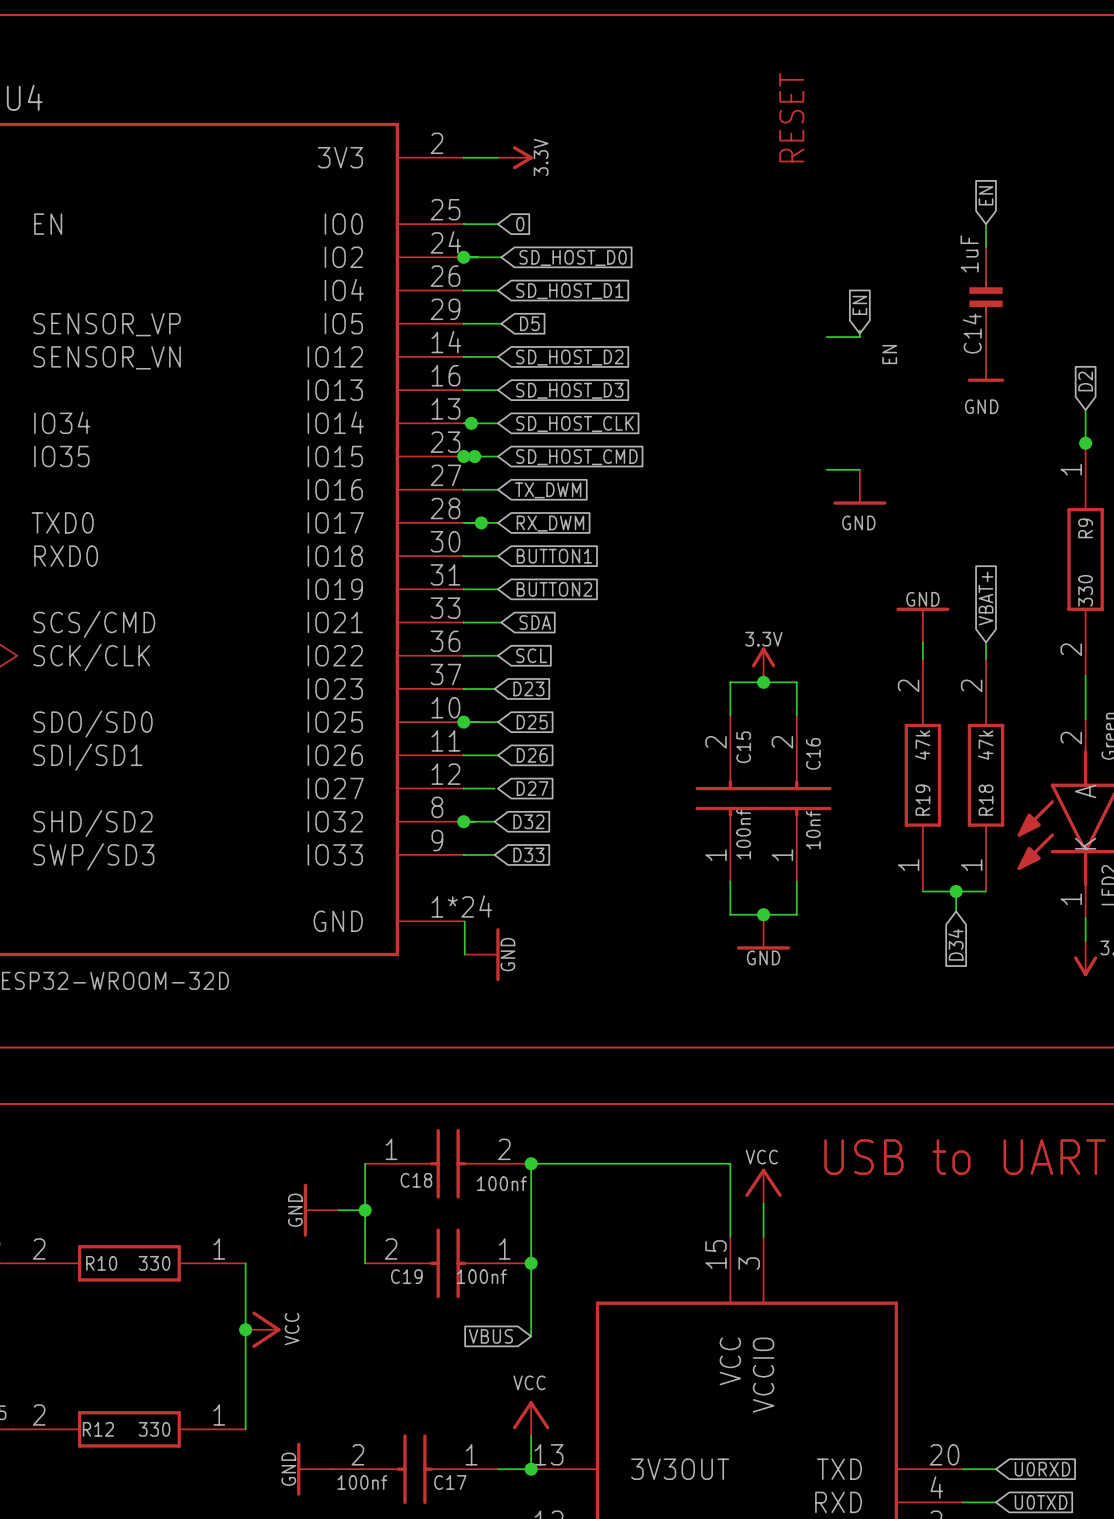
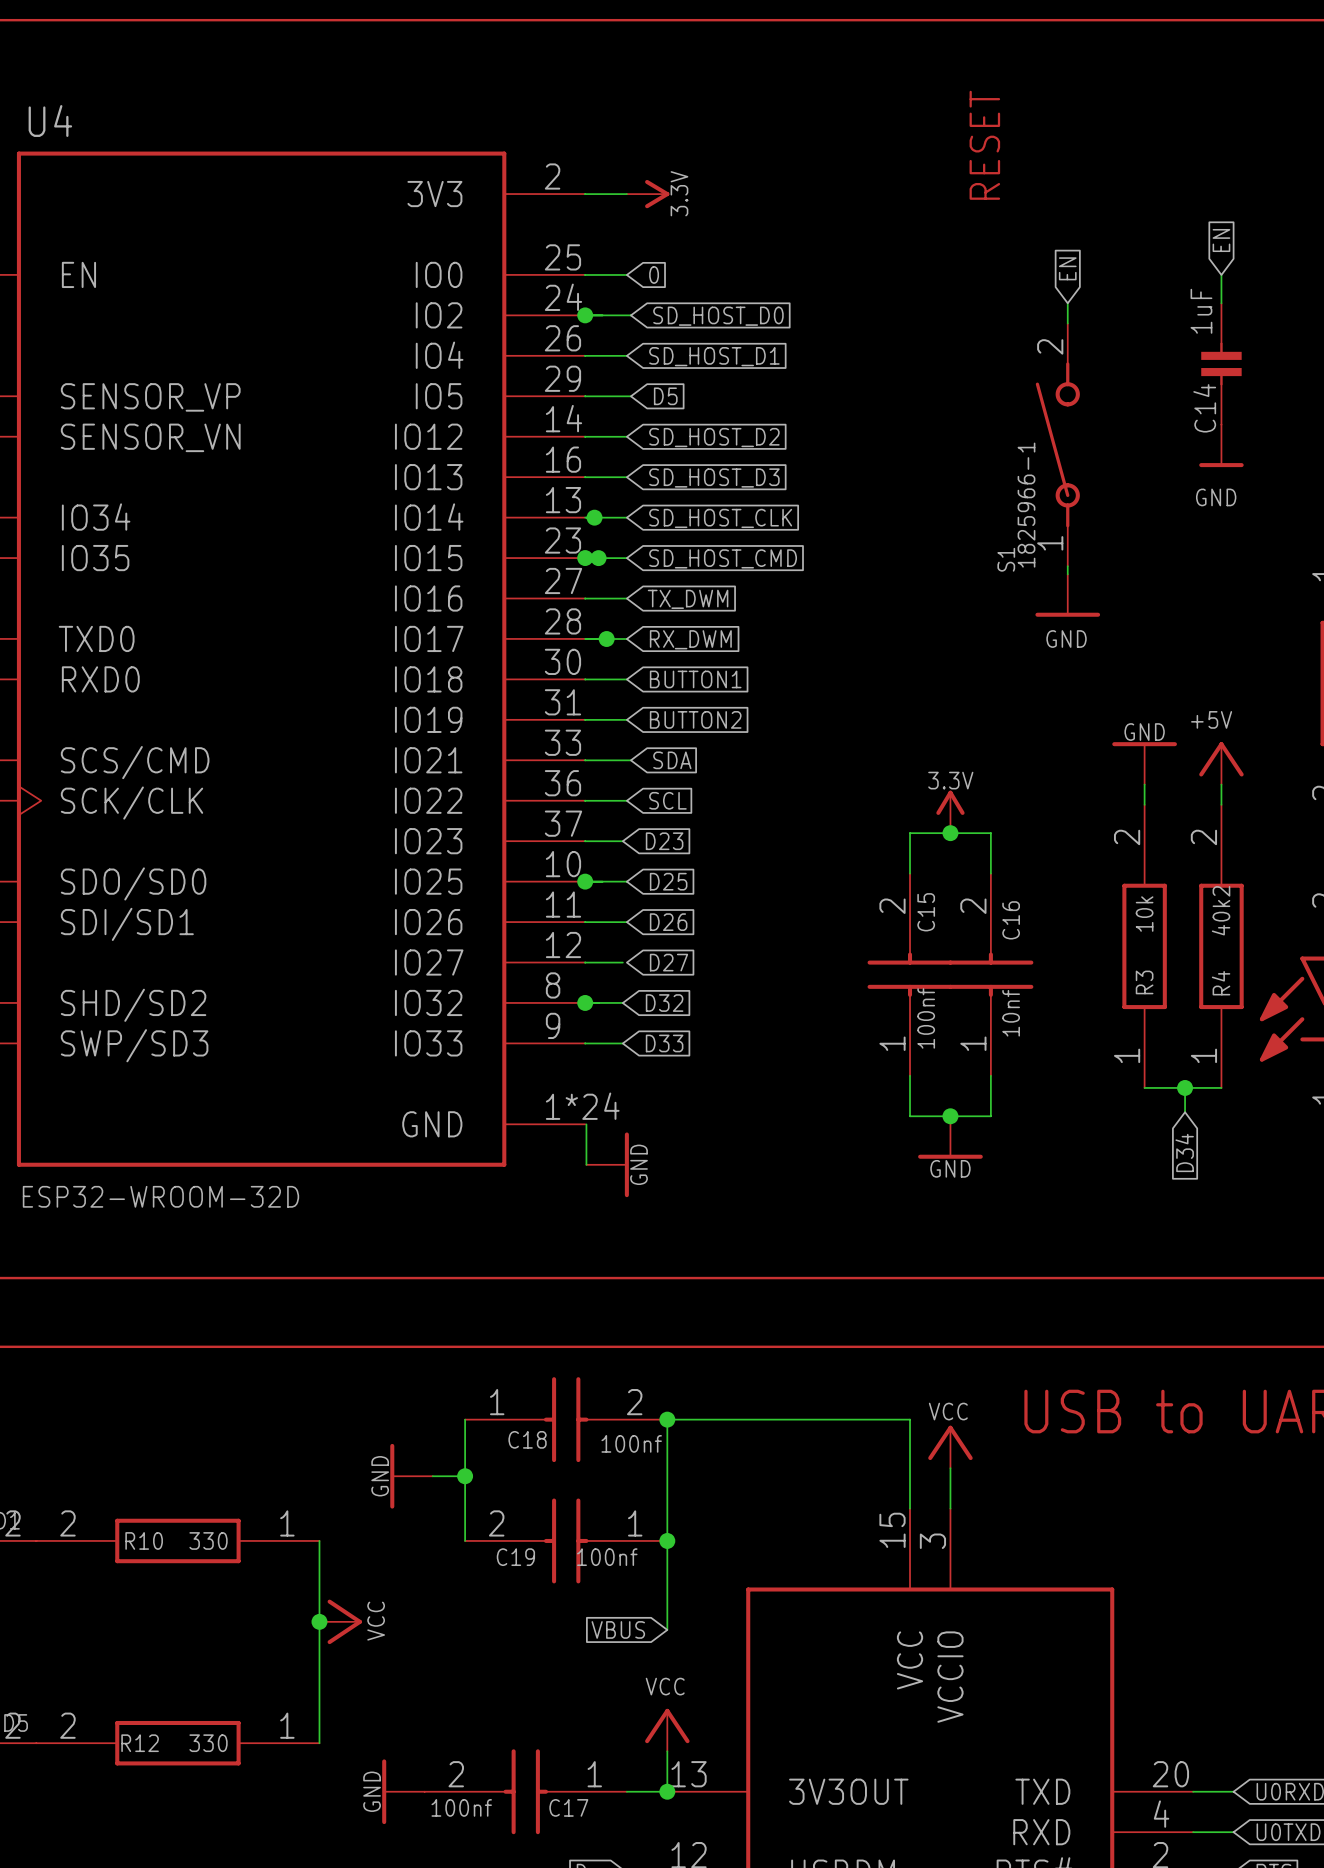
wire: none -> (1067, 303) (1067, 323)
global label position: EN (859, 305) -> EN (1067, 268)
wire: (859, 330) (859, 337) (826, 337) -> none
label: EN (889, 354) -> none
S1: none -> 1825966-1 (1057, 444)
wire: (826, 469) (859, 469) -> (1067, 566) (1067, 574)
global label: VBAT+ (986, 598) -> none
power symbol: none -> +5V (1221, 763)
R19 value: 47k (922, 745) -> 10k (1144, 914)
R18 value: 47k (985, 745) -> 40k2 (1221, 910)
R19 name: R19 (922, 800) -> R3 (1144, 982)
R18 name: R18 (986, 800) -> R4 (1221, 983)

